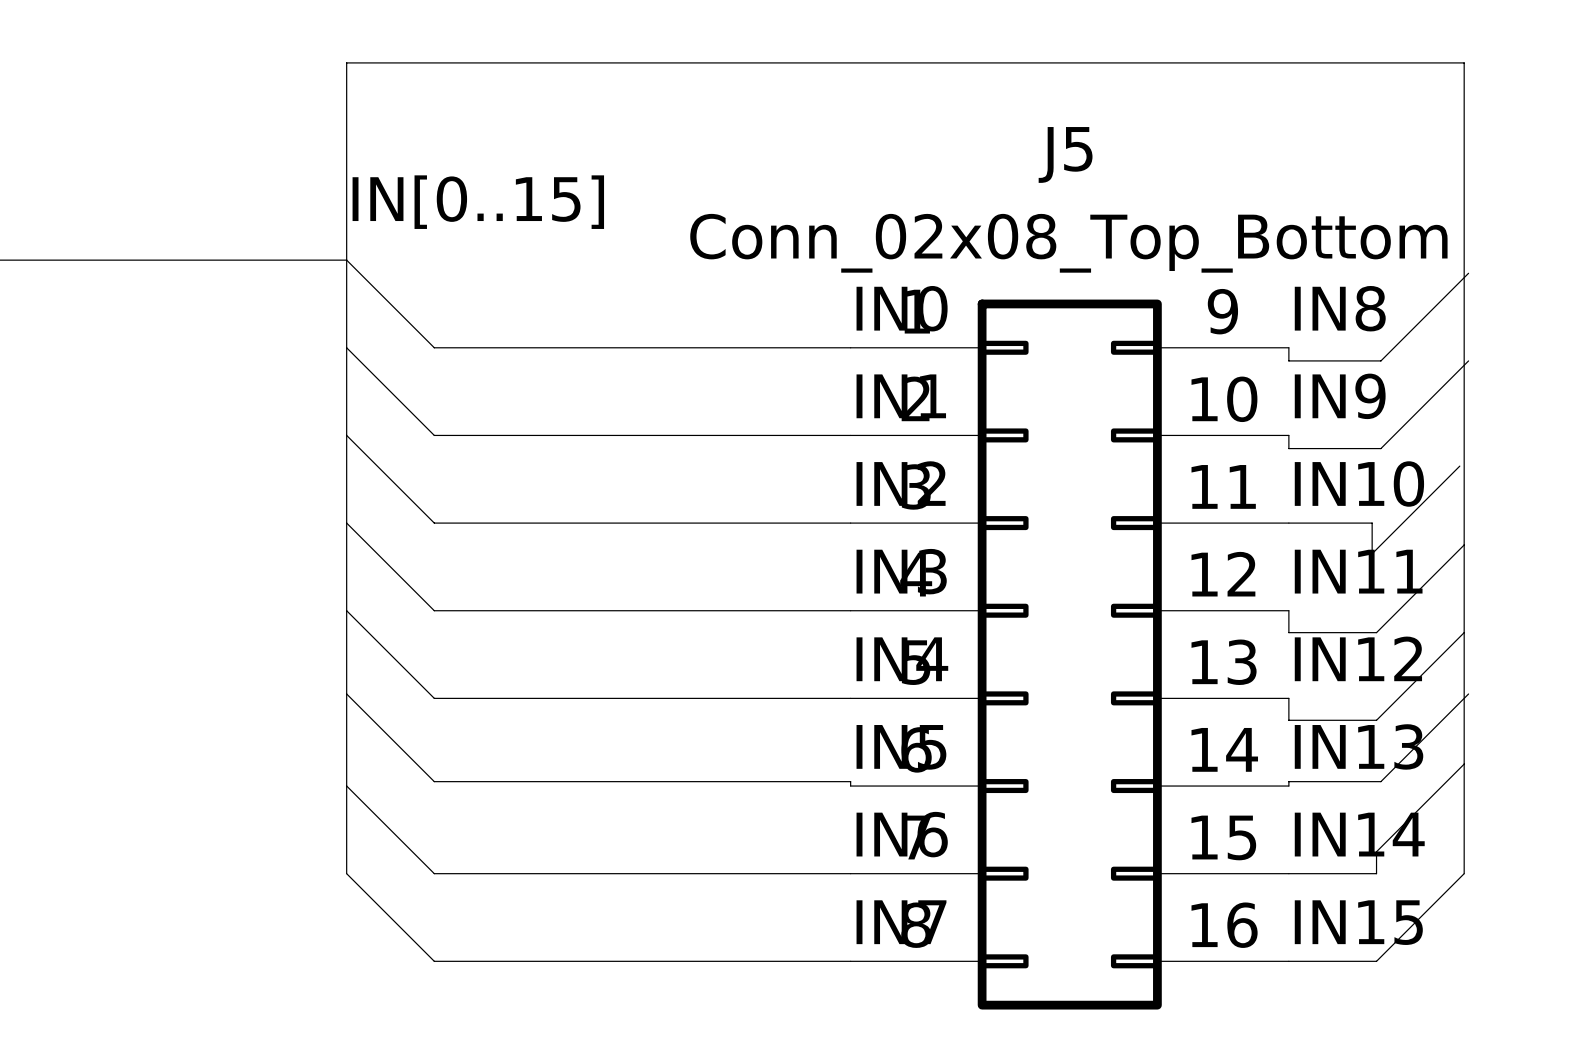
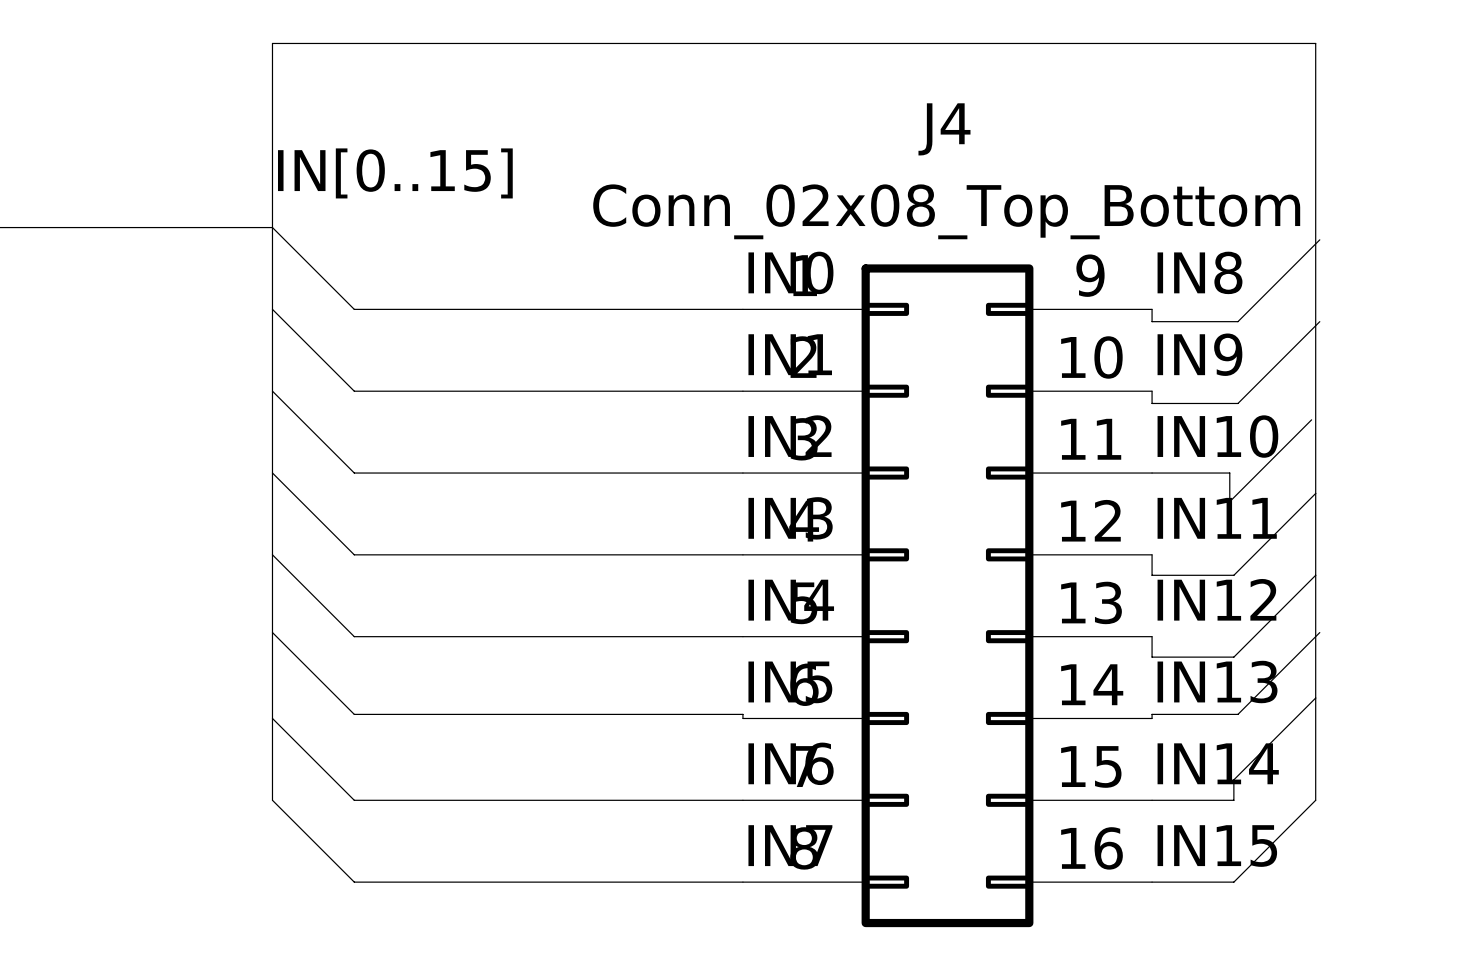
J5 name: J5 (1065, 154) -> J4 (944, 129)

